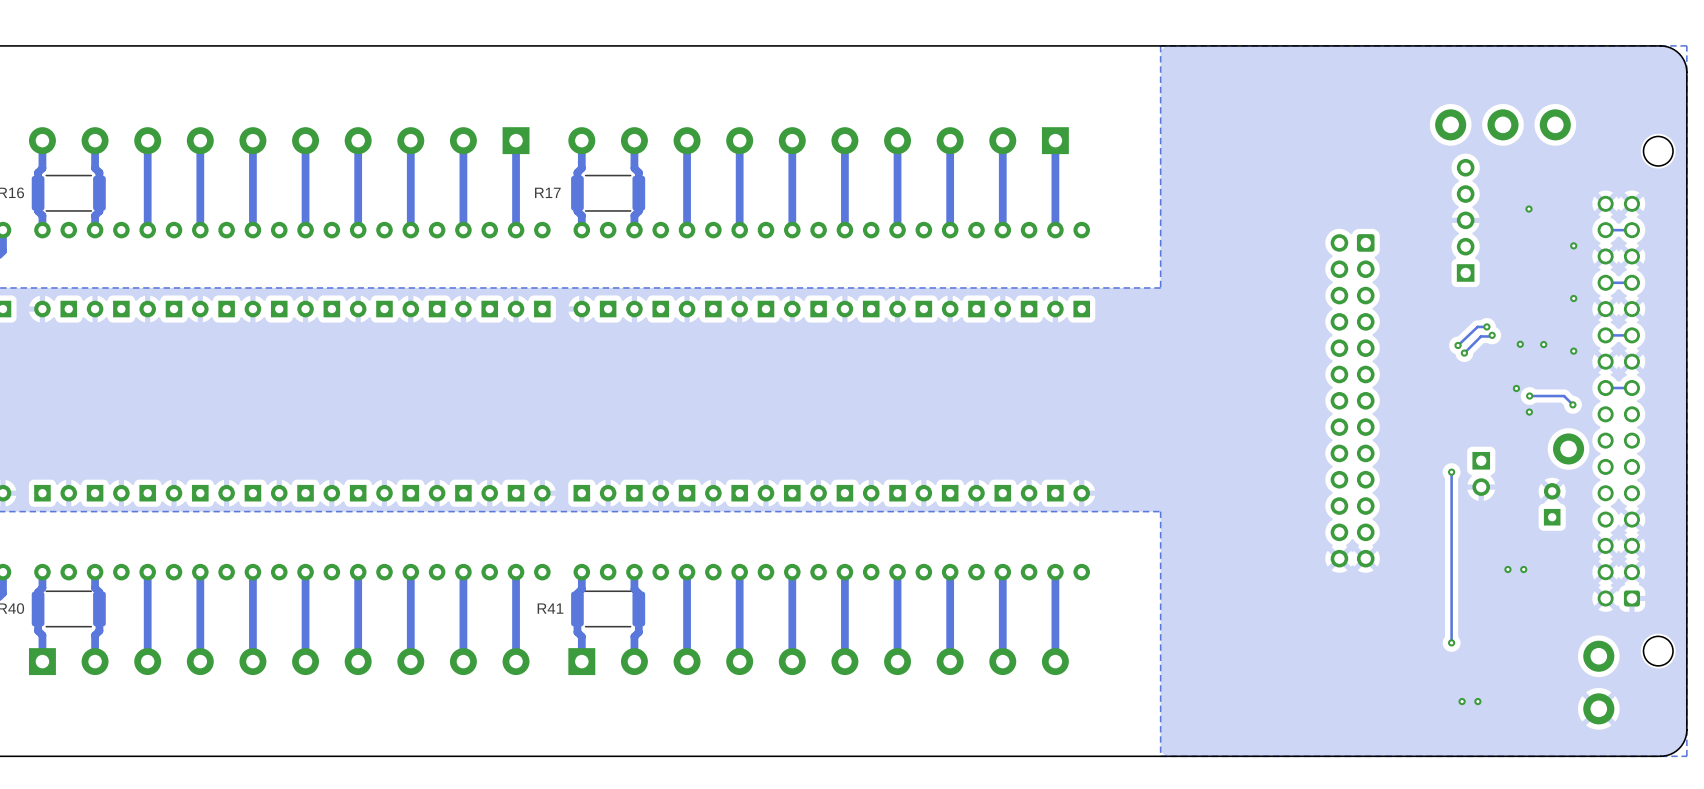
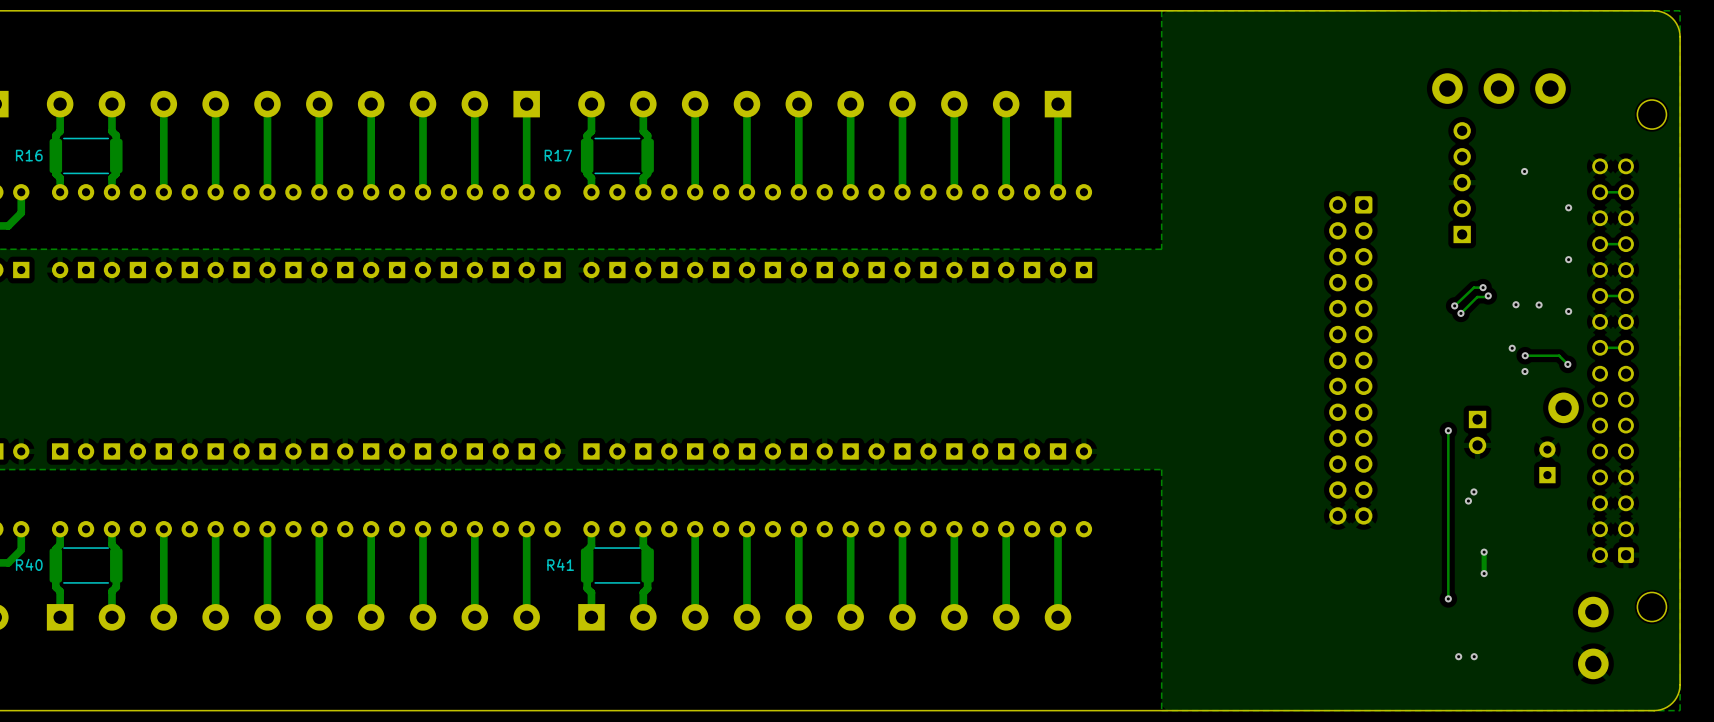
via: none -> (1473, 491)
via: none -> (1468, 501)
via: (1507, 569) -> none
via: (1523, 569) -> none
track: none -> (1484, 552) (1484, 573)
via: none -> (1484, 552)
via: none -> (1484, 573)

